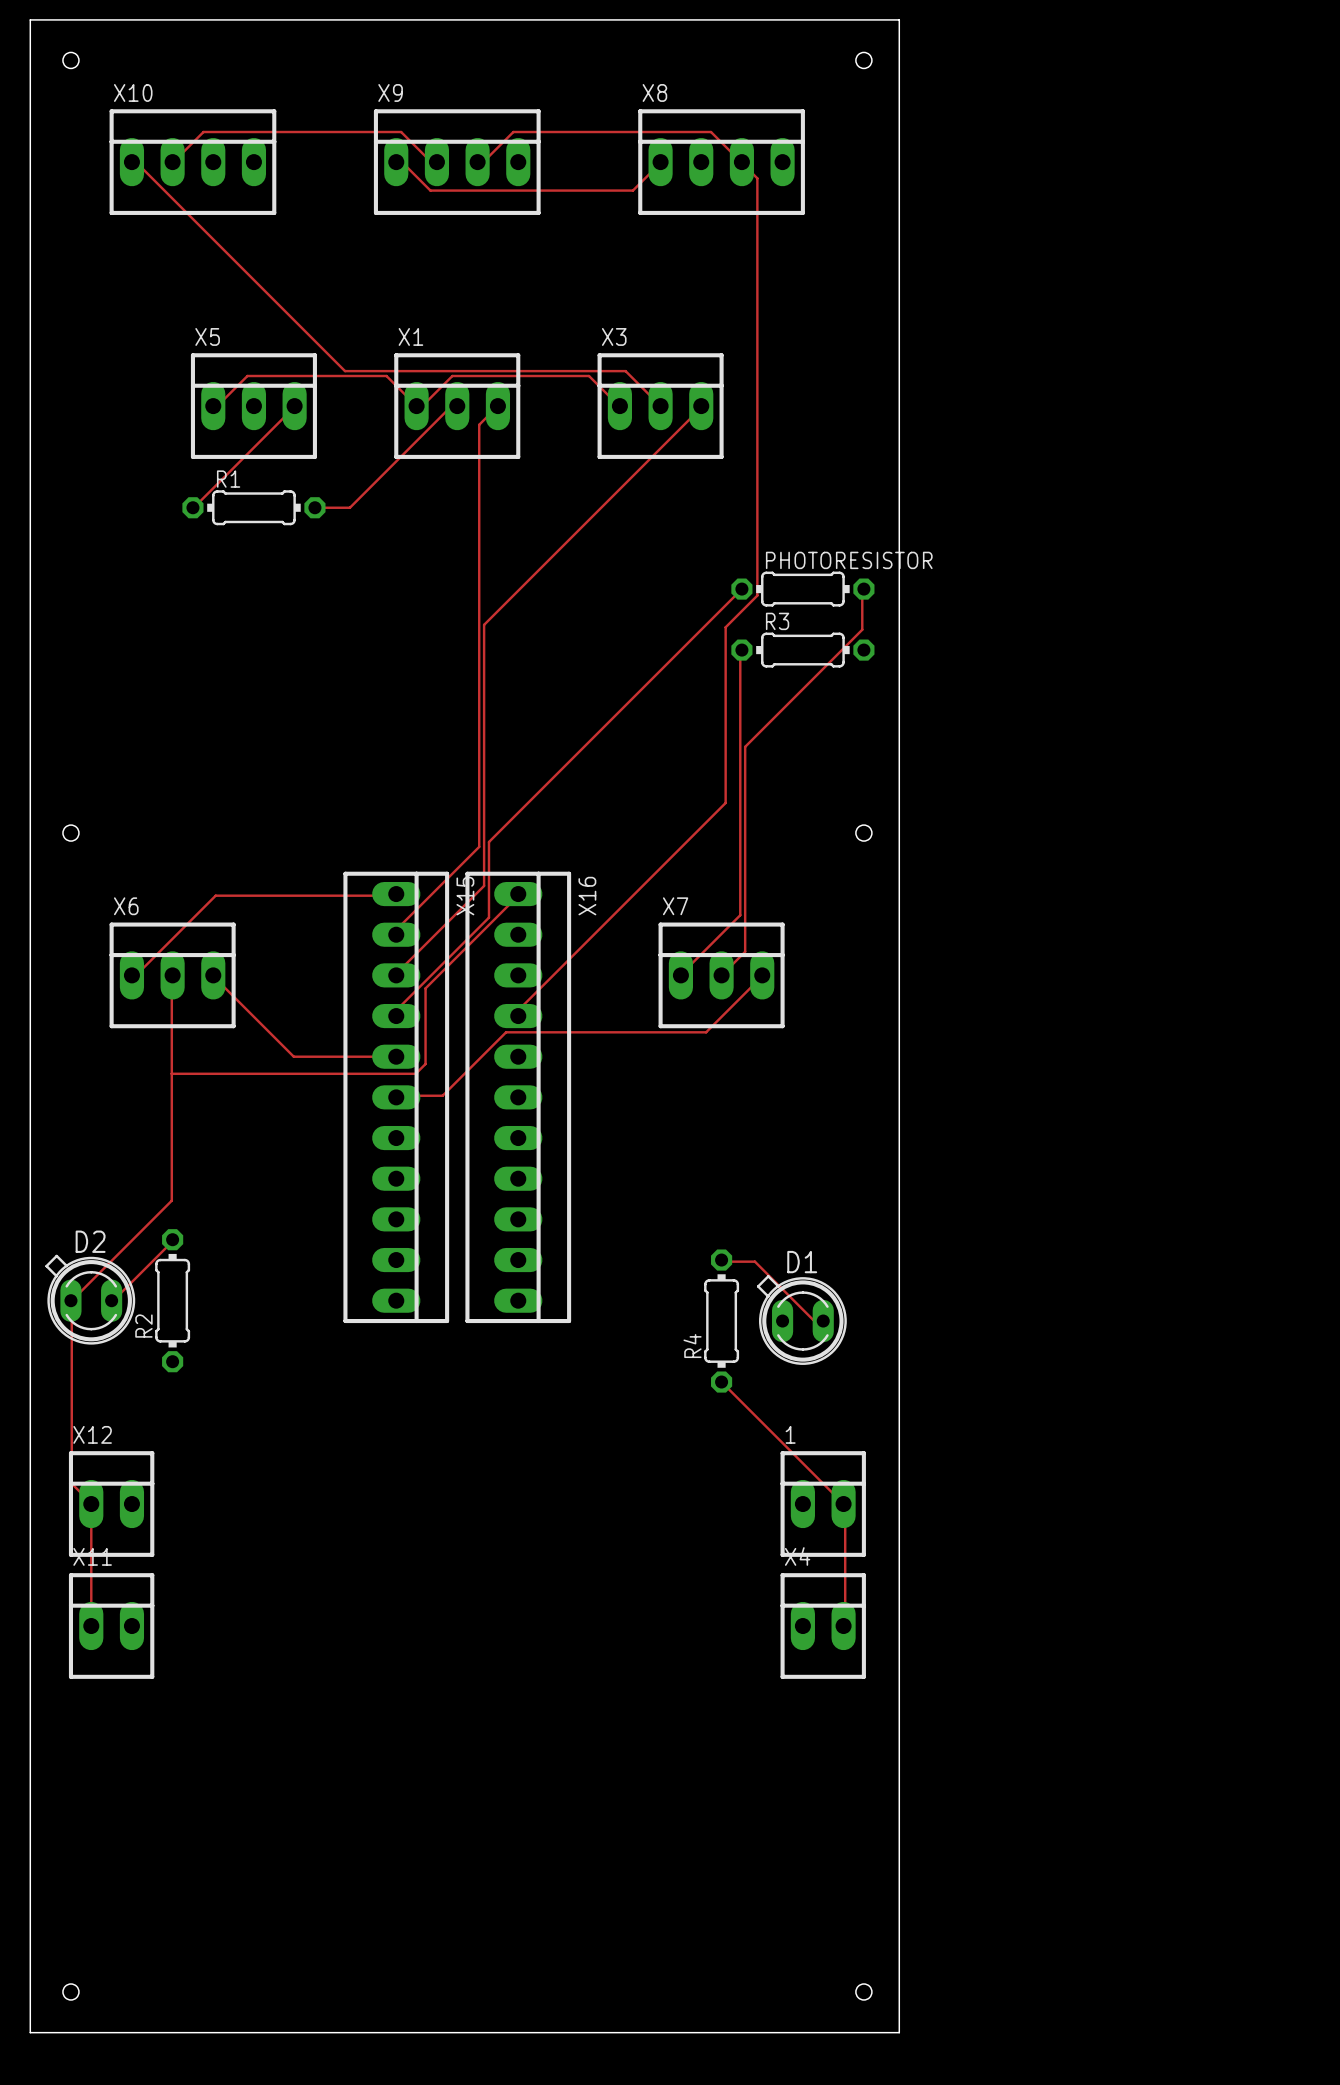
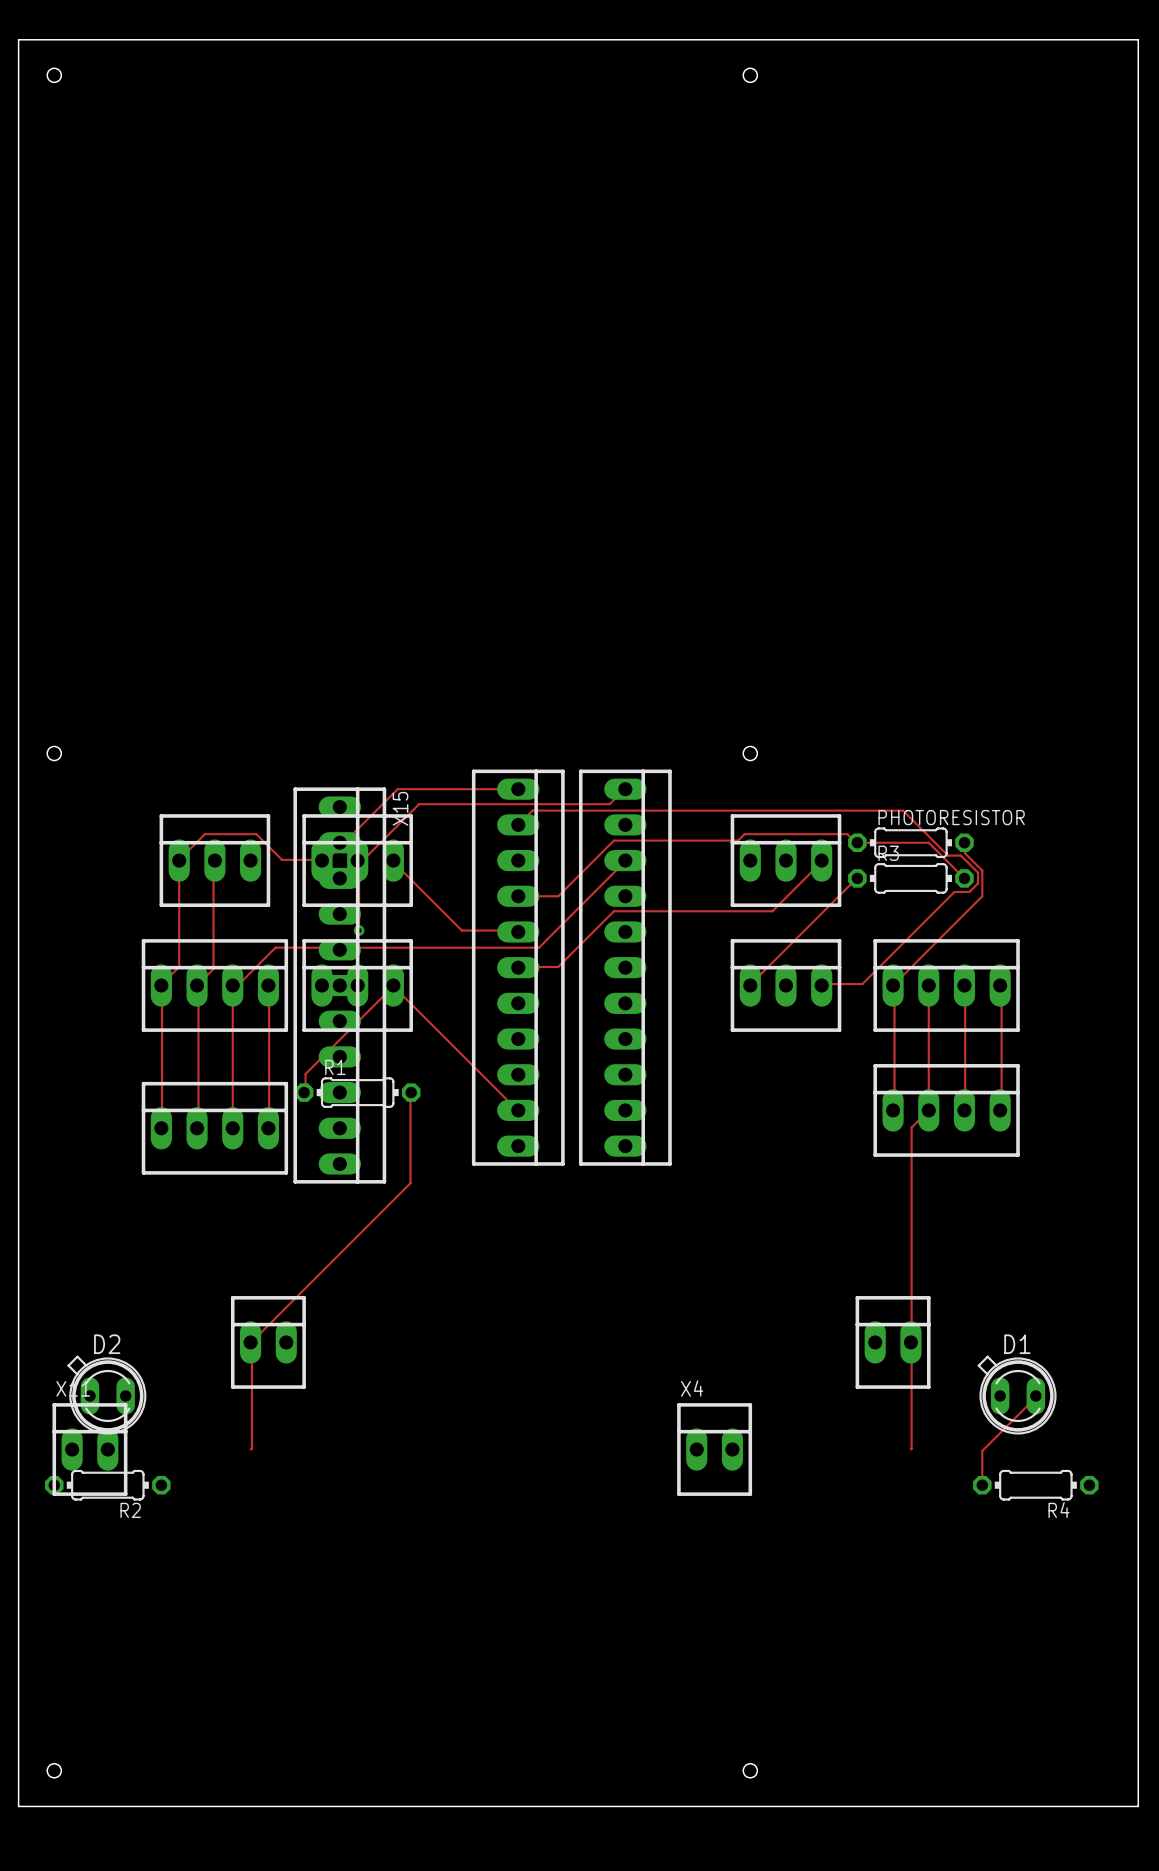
board edge: (899, 19) (899, 2032) -> (781, 39) (1138, 39) (1138, 1806) (781, 1806)
track: (131, 162) (137, 163) (345, 371) (625, 371) (660, 406) -> none
track: (172, 162) (203, 132) (401, 132) (430, 161) (436, 162) -> none
X10: (192, 162) -> none
track: (396, 162) (396, 163) (403, 163) (430, 190) (632, 190) (660, 162) -> none
X9: (457, 162) -> none
track: (477, 162) (484, 161) (513, 132) (711, 132) (757, 178) (757, 595) (725, 627) (725, 802) (518, 1010) (518, 1016) -> none
X8: (721, 162) -> none
track: (213, 406) (218, 405) (247, 376) (386, 376) (416, 406) (423, 405) (452, 376) (589, 376) (619, 406) -> none
X5: (253, 406) -> none
track: (294, 406) (192, 507) -> none
track: (457, 406) (457, 407) (449, 407) (349, 507) (314, 507) -> none
X1: (457, 406) -> none
track: (497, 406) (479, 424) (479, 846) (396, 929) (396, 934) -> none
X3: (660, 406) -> none
track: (701, 406) (484, 624) (484, 885) (396, 975) -> none
R1 position: (253, 507) -> (357, 1092)
track: (741, 589) (488, 842) (488, 917) (396, 1010) (396, 1016) -> none
PHOTORESISTOR: (802, 589) -> none
track: (863, 589) (862, 590) (862, 629) (745, 746) (745, 951) (721, 975) -> none
track: (741, 650) (740, 651) (740, 915) (680, 975) -> none
R3 position: (802, 650) -> (910, 878)
track: none -> (518, 789) (397, 789) (326, 859) (282, 859) (256, 834) (204, 834) (179, 859) (179, 878)
track: none -> (625, 789) (609, 804) (419, 804) (363, 859) (357, 860) (359, 930)
track: (396, 894) (396, 895) (215, 895) (137, 973) (131, 975) -> none
track: (518, 894) (425, 988) (425, 1064) (415, 1073) (171, 1073) -> none
track: none -> (518, 824) (532, 810) (903, 810) (948, 855) (960, 855) (978, 872) (978, 883) (969, 891) (954, 891) (862, 984) (821, 985)
PHOTORESISTOR: none -> (910, 842)
track: none -> (964, 842) (965, 853) (982, 870) (982, 896) (893, 985) (893, 1110)
track: none -> (214, 860) (213, 969) (197, 985) (197, 1128)
part: none -> (214, 860)
part: none -> (357, 860)
track: none -> (393, 860) (461, 930) (518, 931)
track: none -> (625, 860) (539, 947) (275, 947) (239, 984) (232, 984) (232, 1128)
part: none -> (786, 860)
track: none -> (821, 860) (772, 911) (613, 911) (558, 966) (518, 967)
track: (172, 975) (171, 1200) (71, 1300) -> none
X6: (172, 975) -> none
X7: (721, 975) -> none
track: (762, 975) (706, 1032) (506, 1032) (442, 1095) (396, 1095) (396, 1097) -> none
track: none -> (857, 878) (750, 985)
track: none -> (964, 878) (928, 842) (855, 842) (847, 834) (744, 834) (738, 840) (613, 840) (558, 896) (518, 896)
track: (213, 976) (293, 1056) (396, 1056) -> (179, 879) (179, 966) (161, 985) (161, 1128)
via: none -> (359, 930)
part: none -> (518, 967)
part: none -> (625, 967)
part: none -> (214, 985)
track: none -> (268, 985) (268, 1128)
part: none -> (357, 985)
X16: (518, 1097) -> none
part: none -> (786, 985)
track: none -> (928, 985) (928, 1110) (911, 1127) (910, 1449)
part: none -> (946, 985)
track: none -> (964, 985) (964, 1110)
track: none -> (1000, 985) (1000, 1110)
track: none -> (393, 986) (305, 1074) (304, 1092)
track: none -> (393, 986) (518, 1110)
track: none -> (411, 1092) (410, 1183) (250, 1342) (250, 1449)
track: (172, 1239) (174, 1239) (111, 1300) -> none
part: none -> (946, 1110)
part: none -> (214, 1128)
track: (721, 1260) (723, 1261) (754, 1261) (813, 1320) (823, 1321) -> none
D2 position: (90, 1299) -> (106, 1395)
track: (71, 1300) (71, 1483) (91, 1503) (91, 1626) -> none
R2 rotation: 0° (172, 1300) -> 90° clockwise (107, 1485)
R2 position: (172, 1300) -> (107, 1485)
D1 position: (801, 1320) -> (1017, 1395)
R4 rotation: 0° (721, 1321) -> 90° clockwise (1035, 1485)
R4 position: (721, 1321) -> (1035, 1485)
R2 name position: R2 (143, 1326) -> R2 (130, 1510)
R4 name position: R4 (692, 1346) -> R4 (1058, 1510)
track: (721, 1382) (845, 1505) (845, 1625) (843, 1626) -> none
X12: (111, 1504) -> none
part: none -> (268, 1342)
1: (823, 1504) -> none
part: none -> (893, 1342)
track: none -> (1035, 1395) (982, 1450) (982, 1485)

